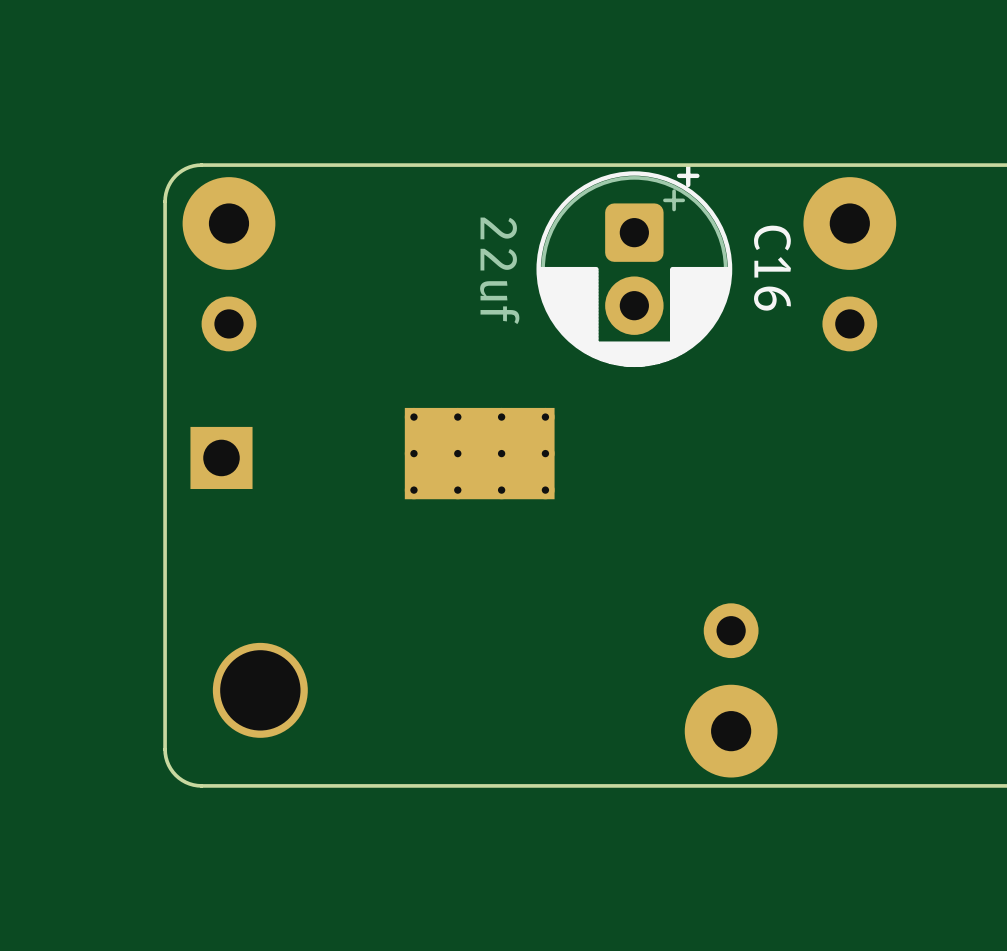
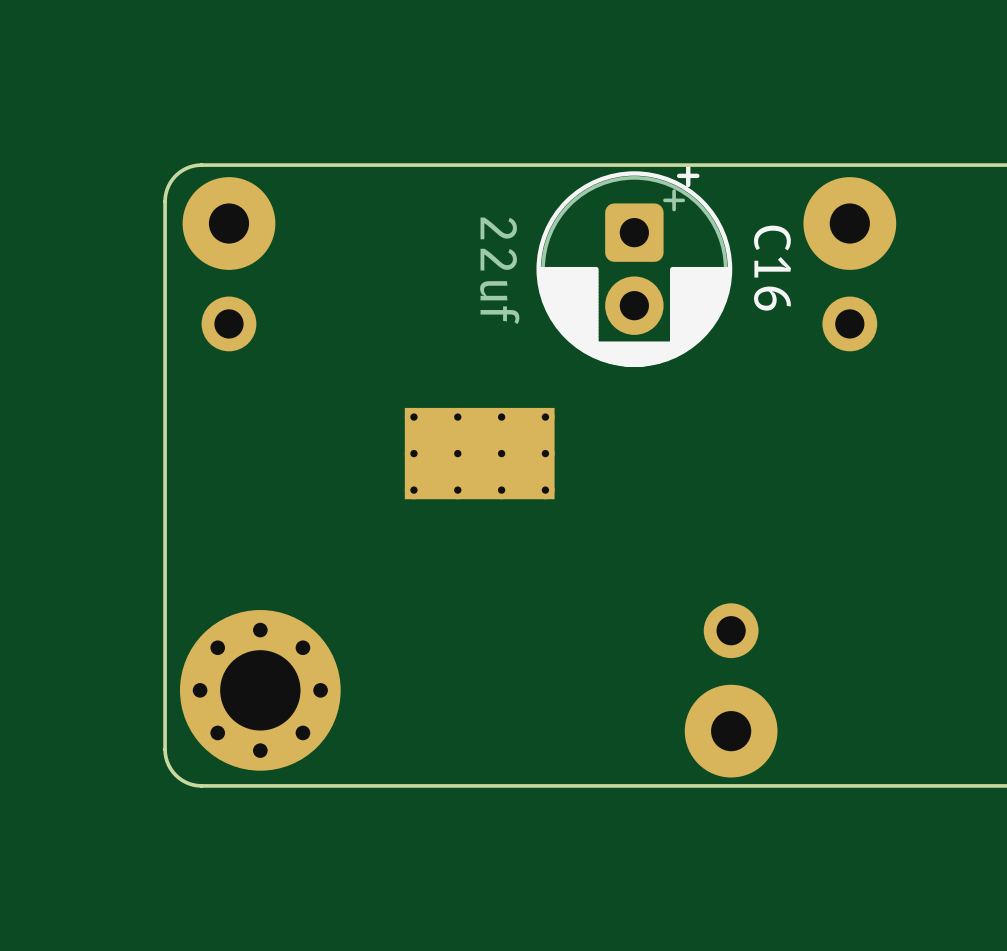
part: (221, 457) -> none
part footprint: [212, 642, 308, 738] -> [179, 610, 341, 771]

